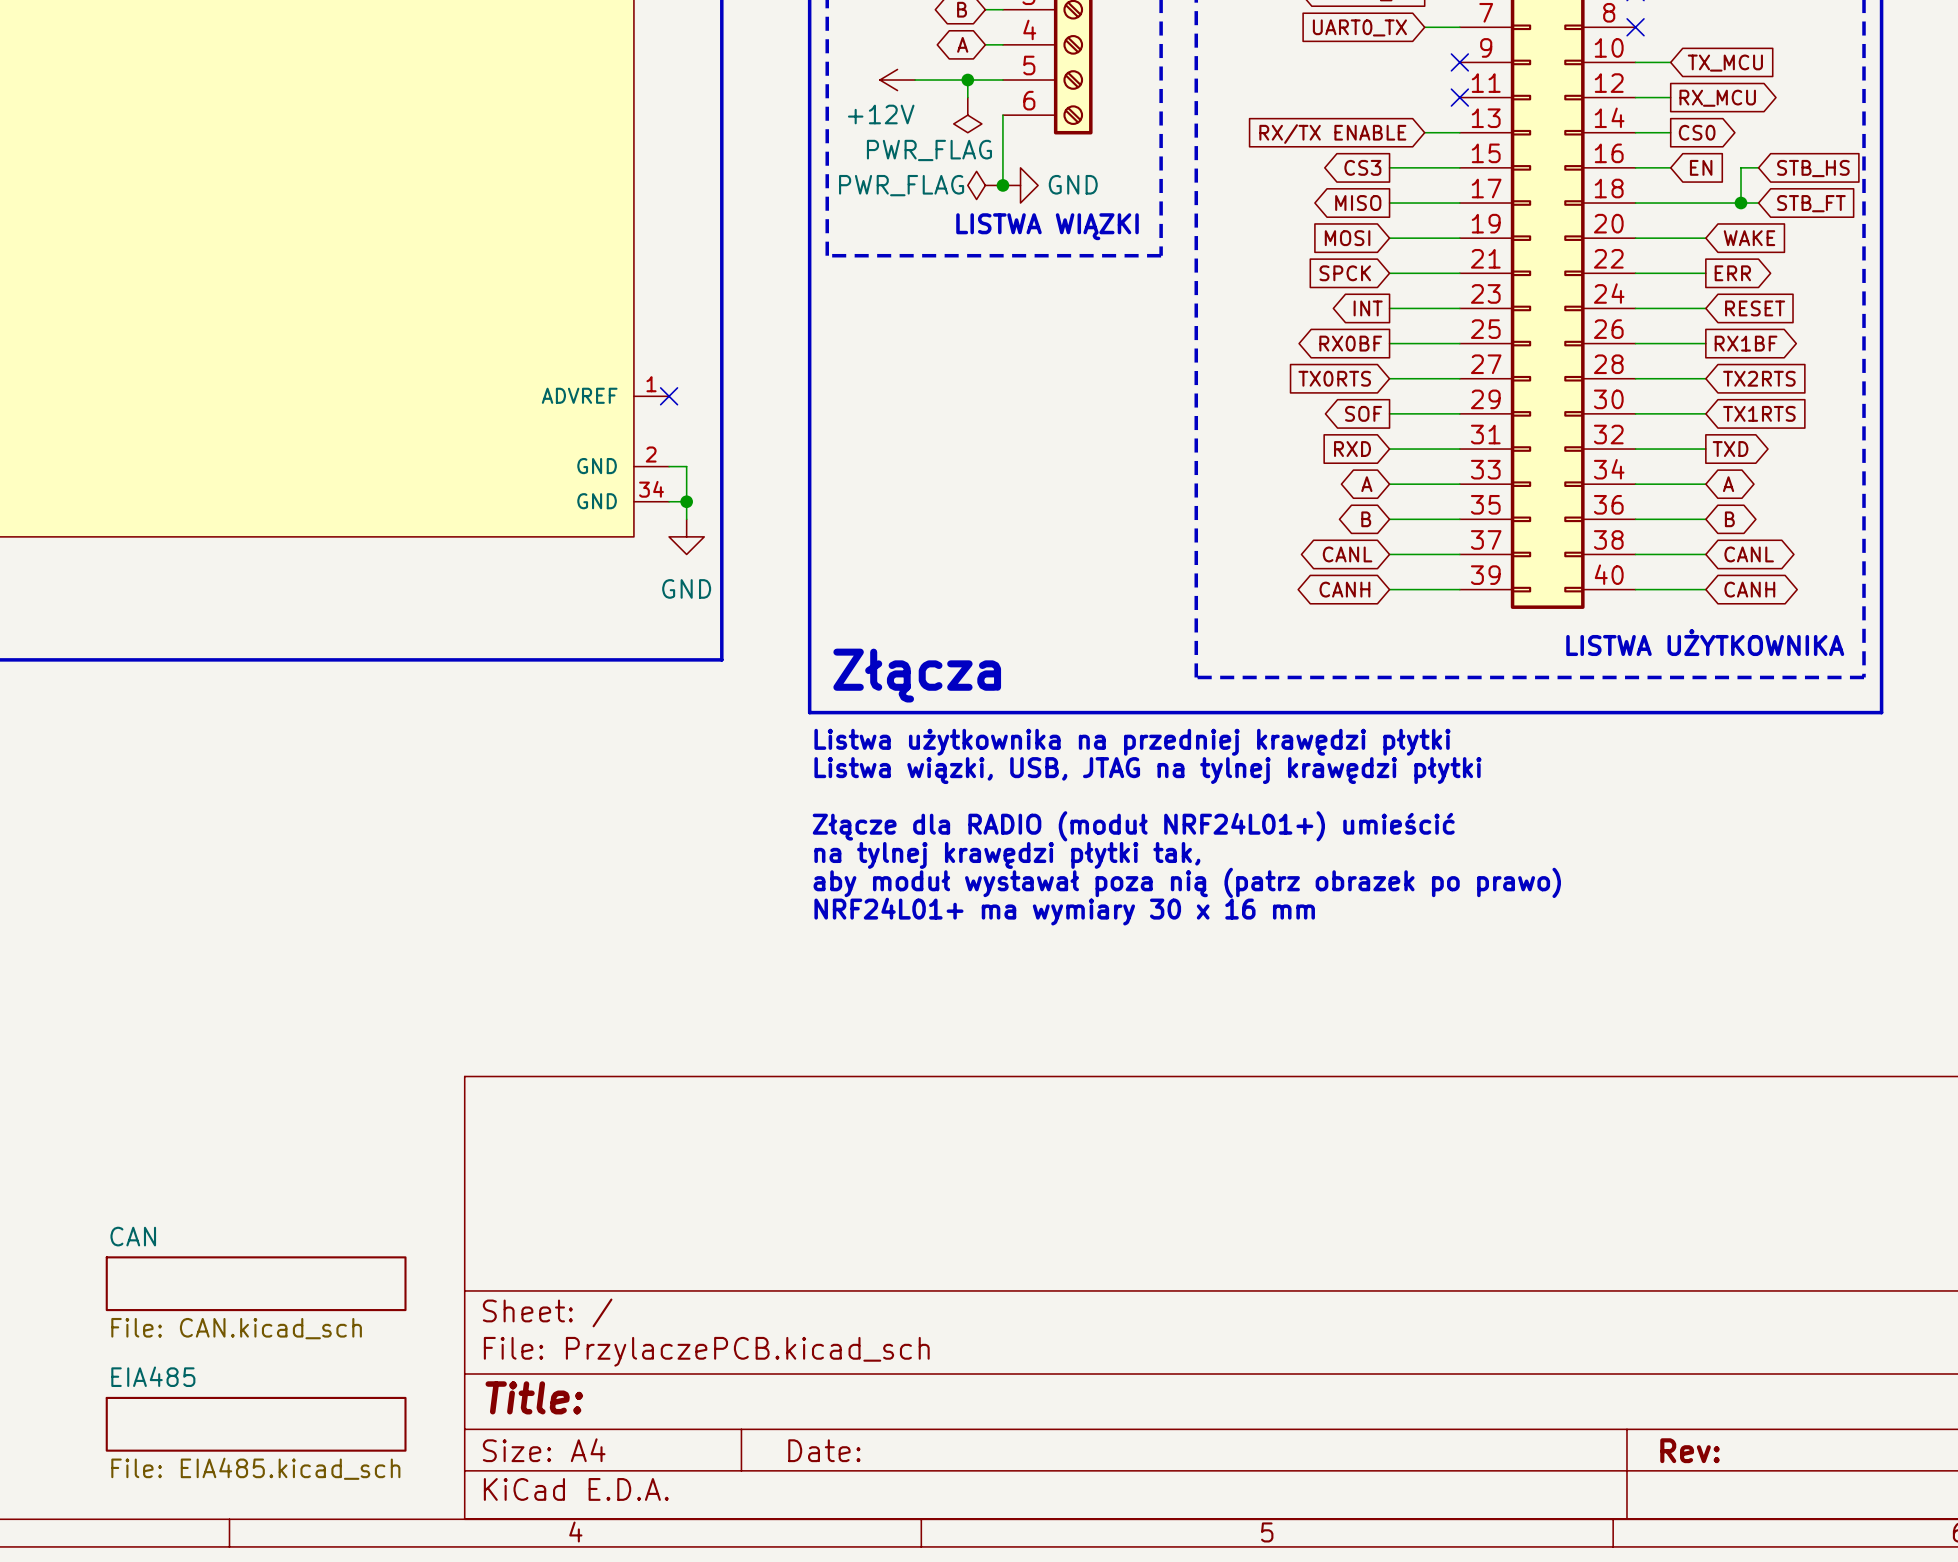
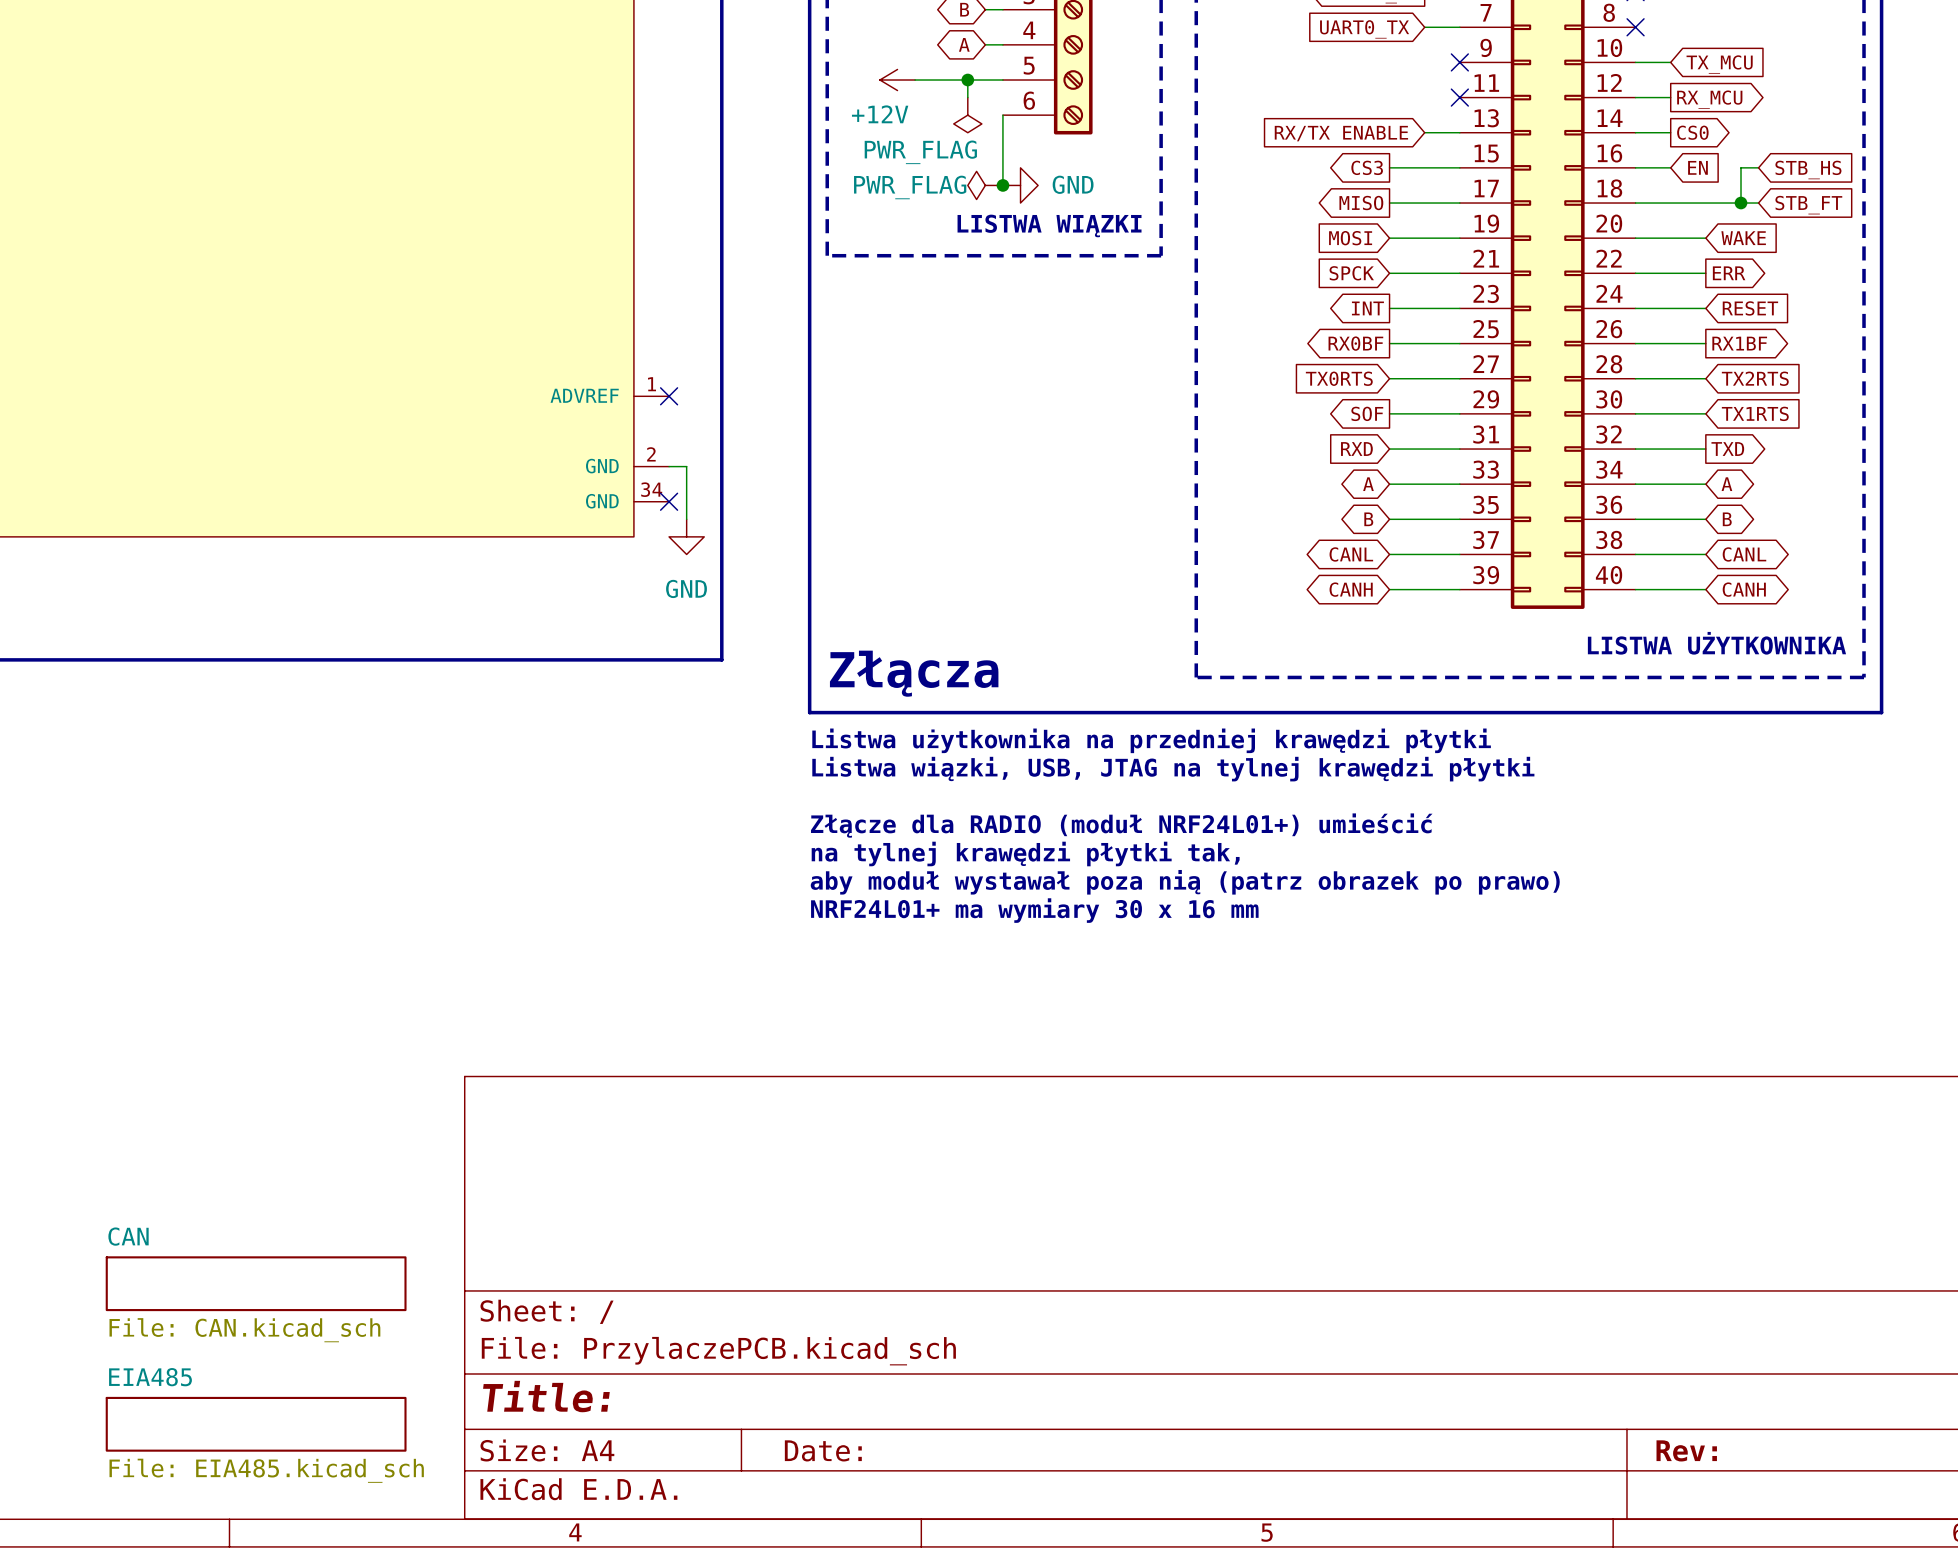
wire: (669, 501) (686, 501) -> none
no-connect mark: none -> (669, 501)
junction: (686, 501) -> none

